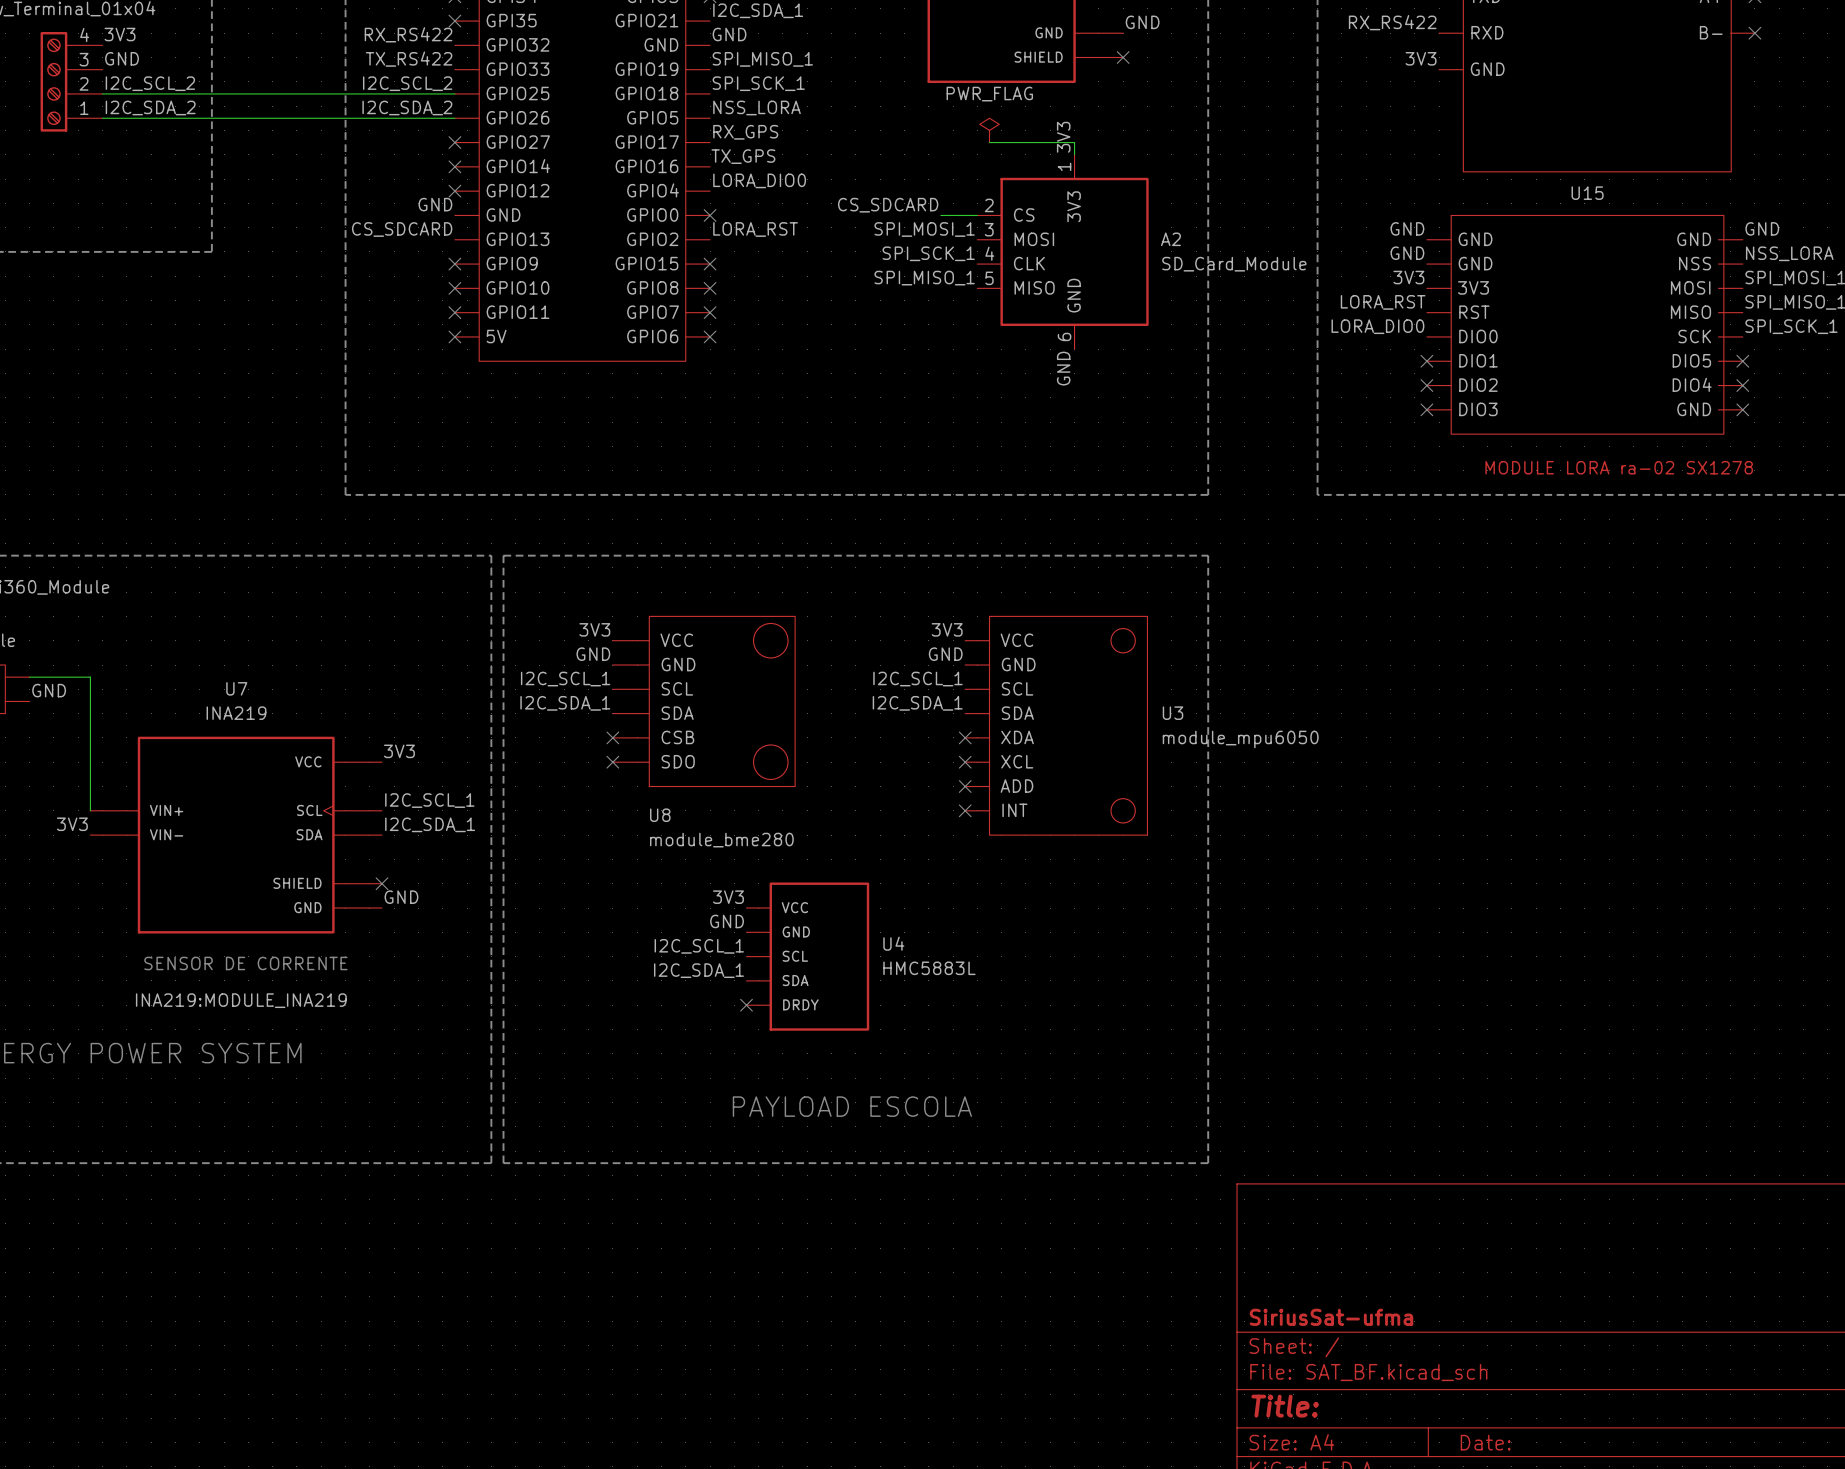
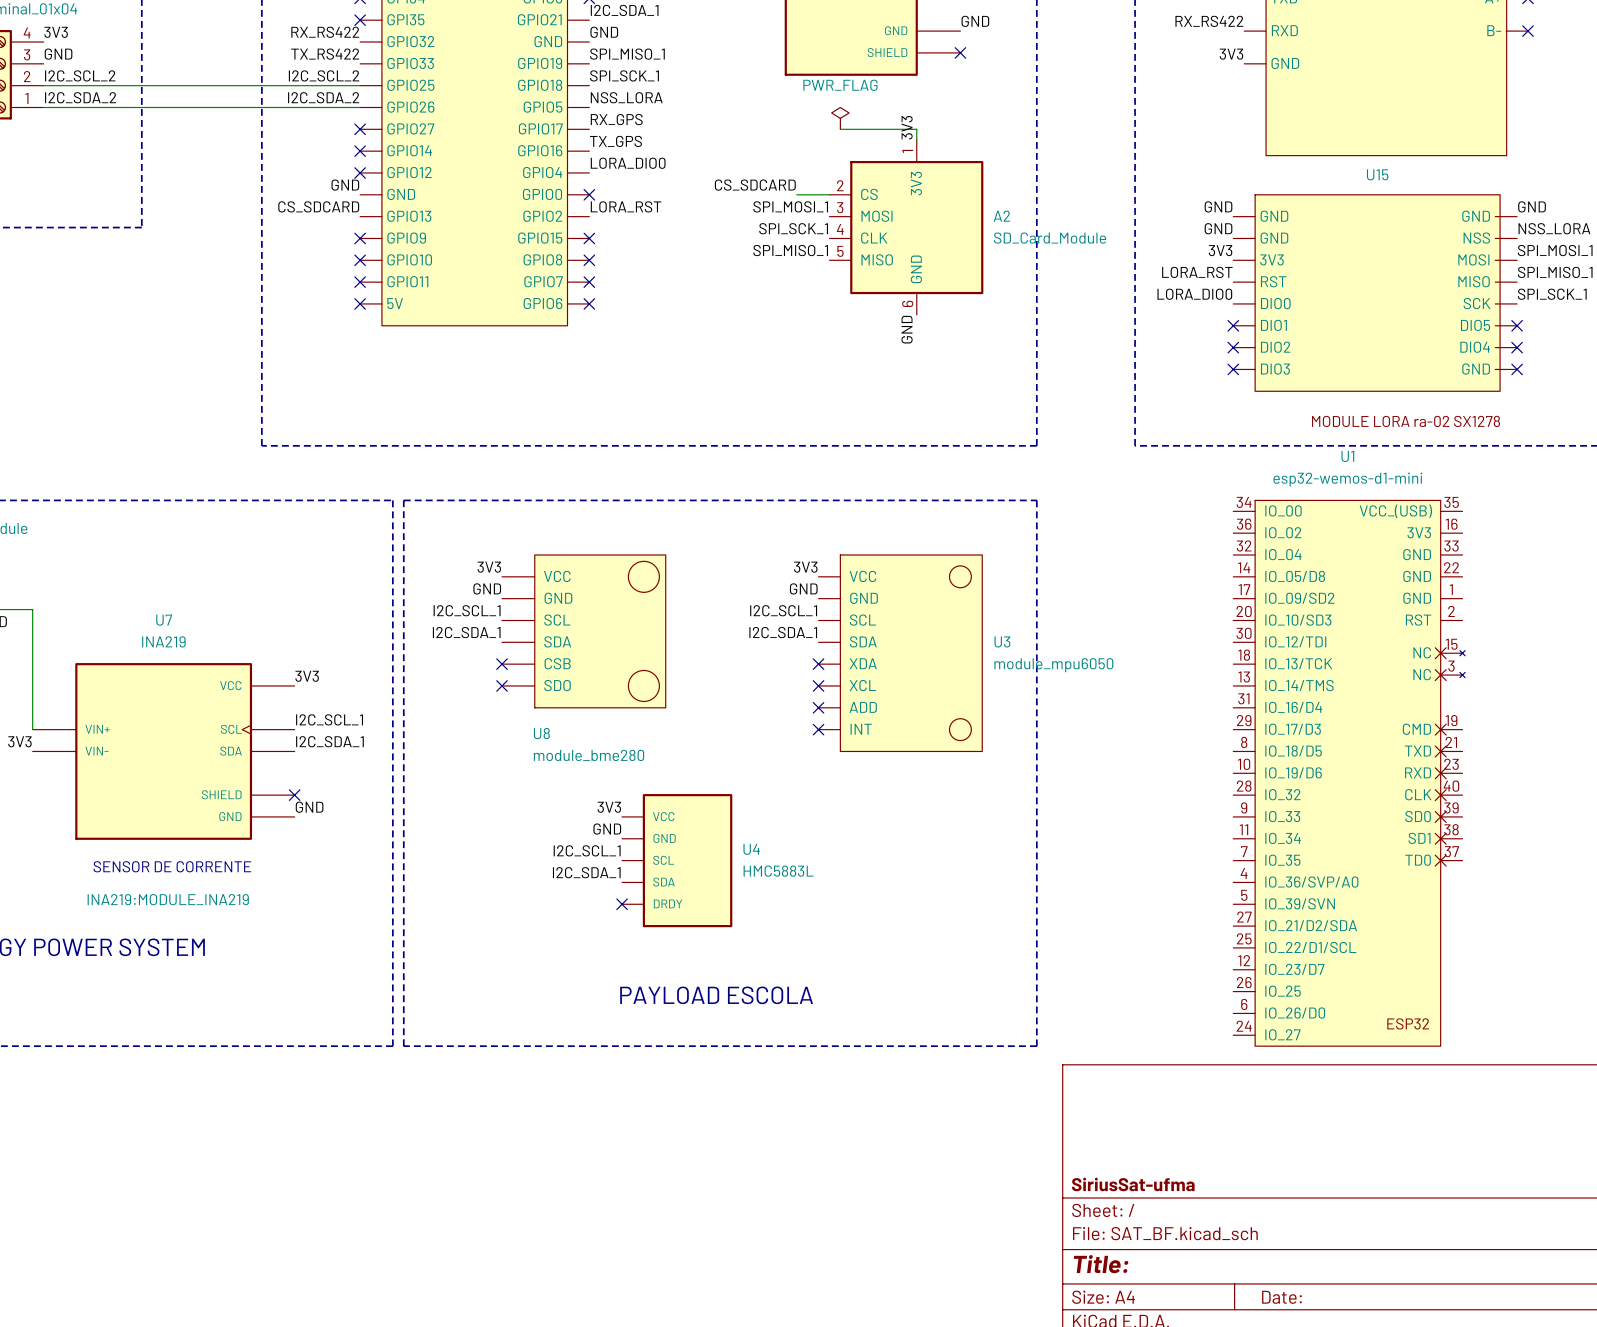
U1: none -> esp32-wemos-d1-mini (1349, 773)

